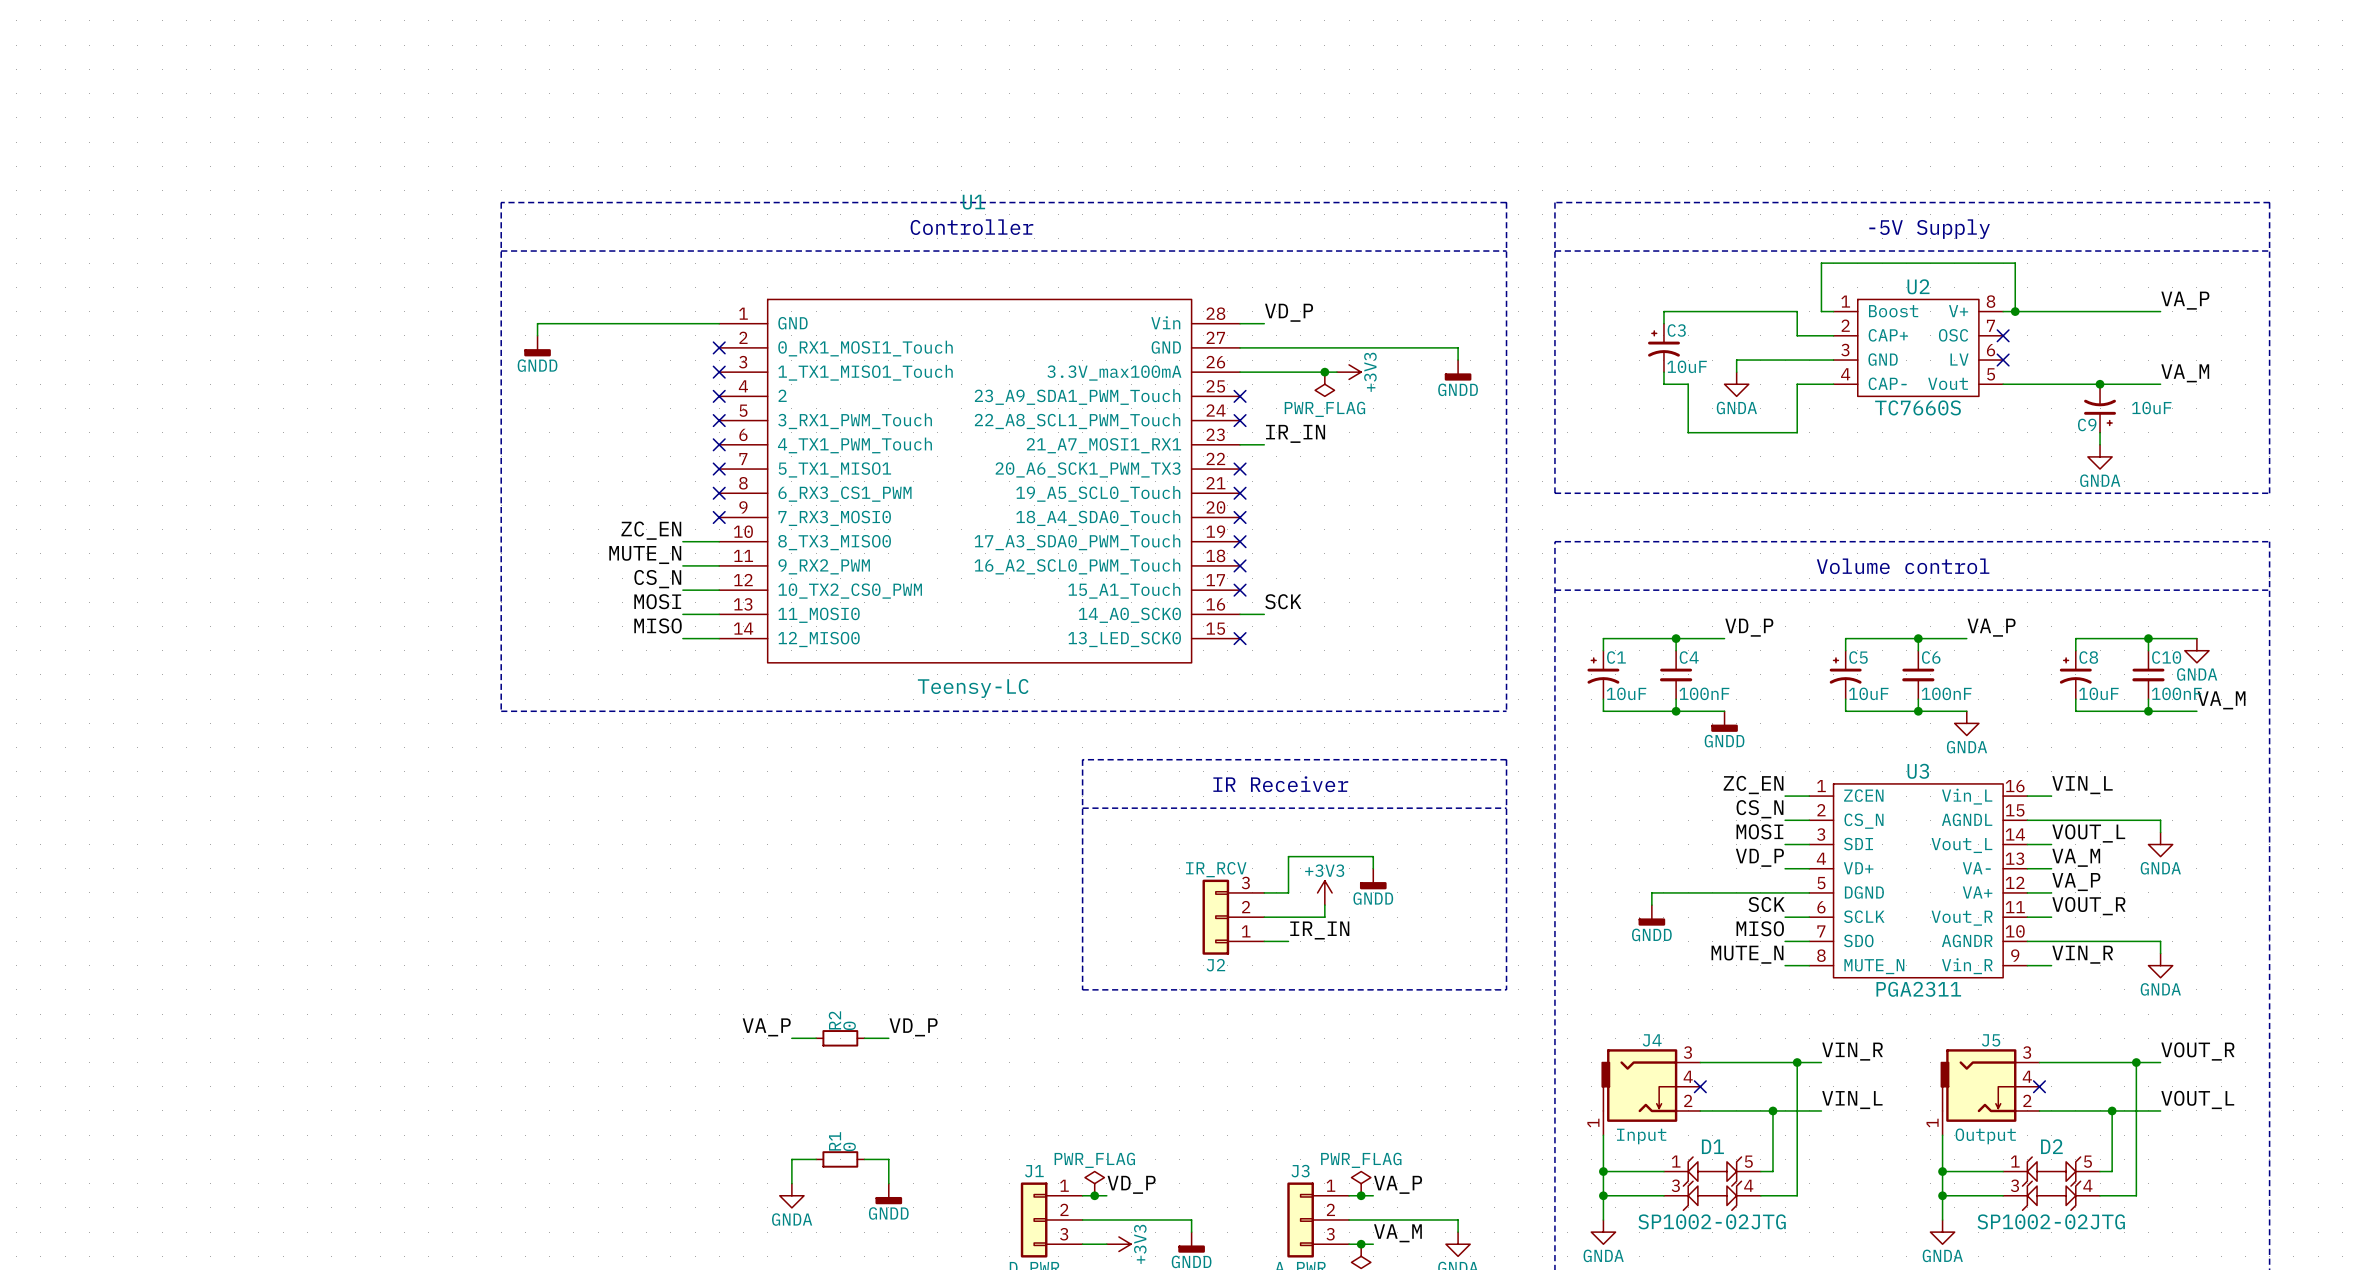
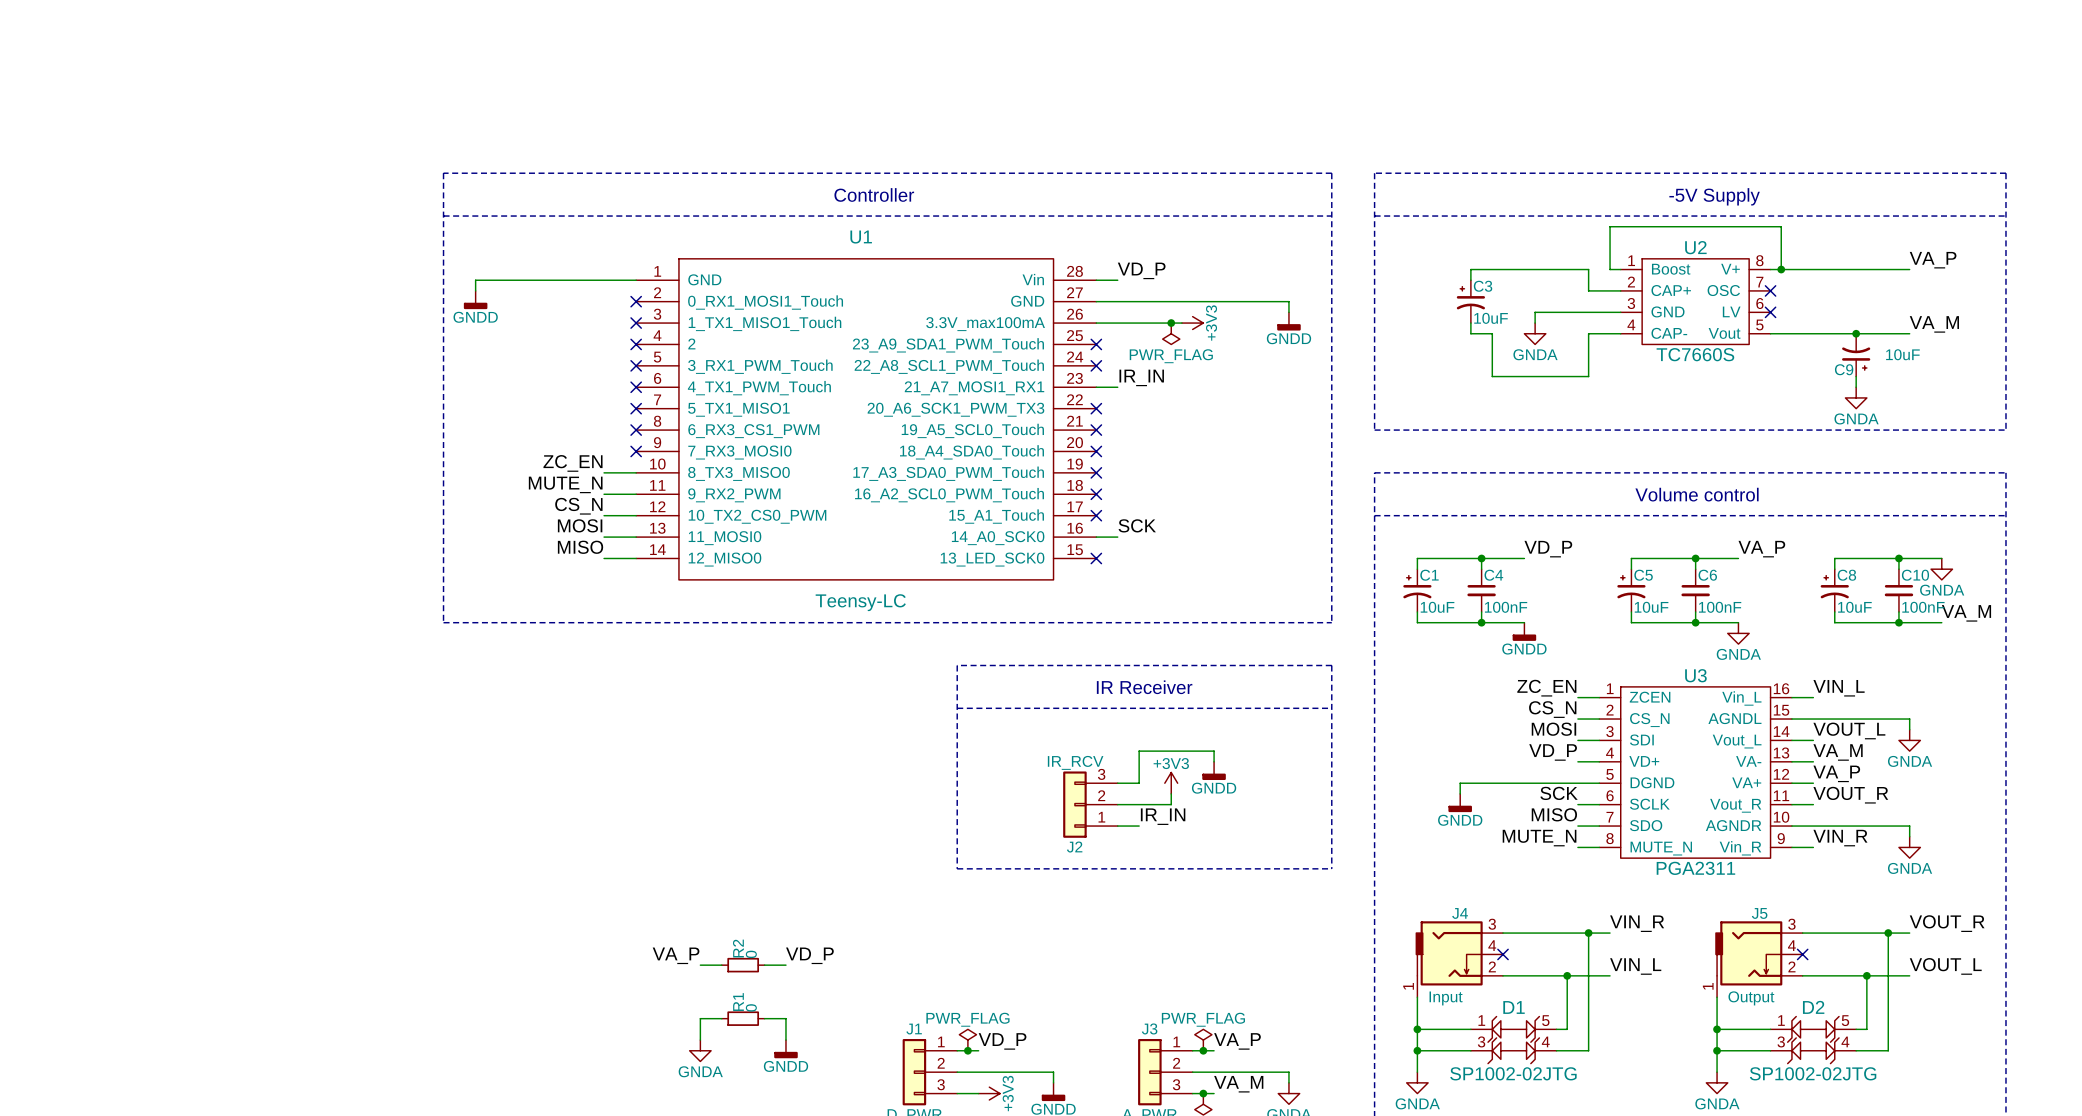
U1 name position: U1 (973, 202) -> U1 (861, 237)
label position: VA_P (766, 1027) -> VA_P (676, 955)
label position: VD_P (913, 1027) -> VD_P (809, 955)
wire: (791, 1038) (816, 1038) -> (700, 965) (721, 965)
R2 position: (840, 1038) -> (743, 965)
wire: (864, 1038) (888, 1038) -> (764, 965) (785, 965)

